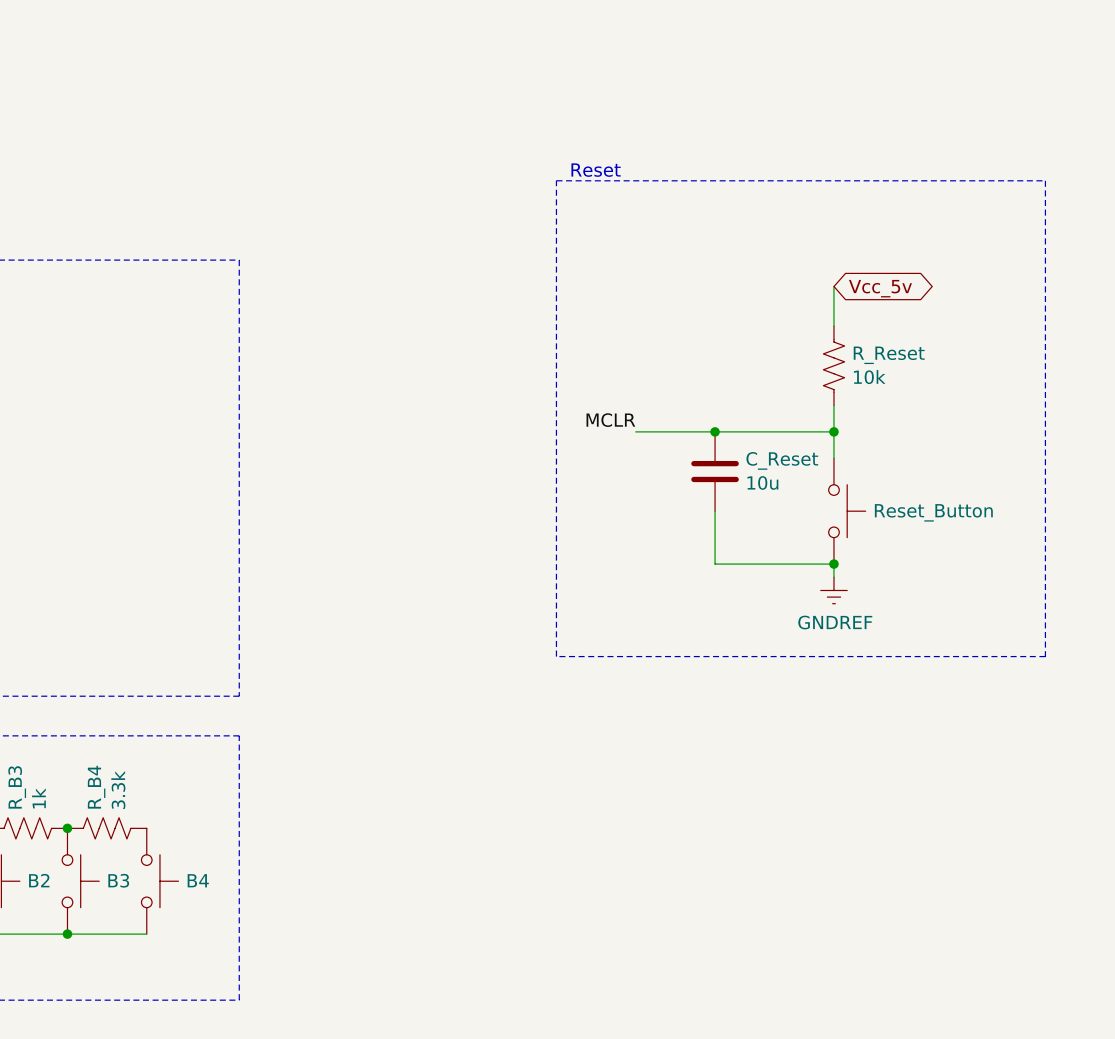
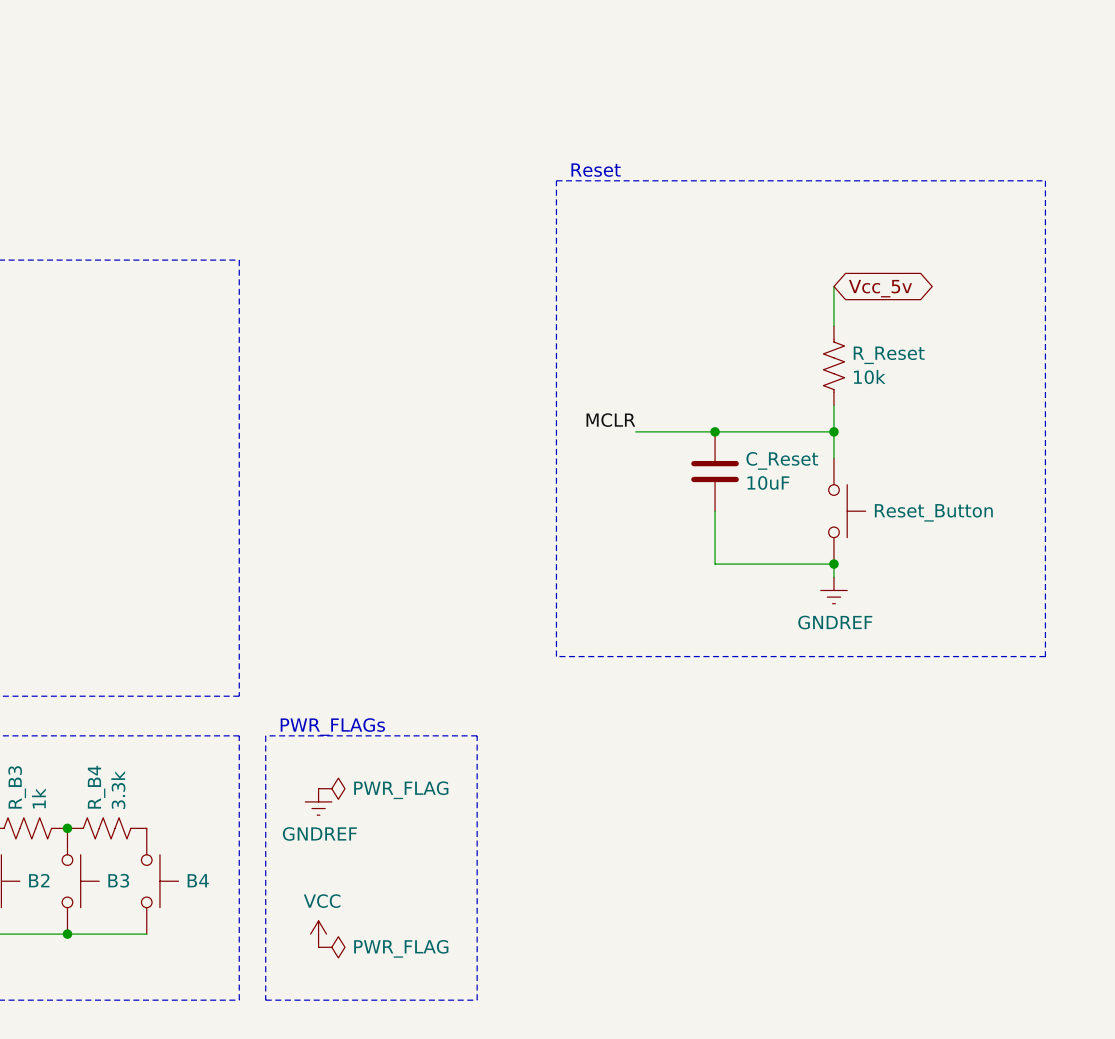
C_Reset value: 10u (762, 482) -> 10uF (768, 482)
text: none -> PWR_FLAGs (332, 727)
line: none -> (265, 735) (477, 735) (477, 1000) (265, 1000) (265, 735)
power symbol: none -> PWR_FLAG (331, 788)
power symbol: none -> GNDREF (318, 801)
power symbol: none -> VCC (318, 934)
power symbol: none -> PWR_FLAG (331, 947)

